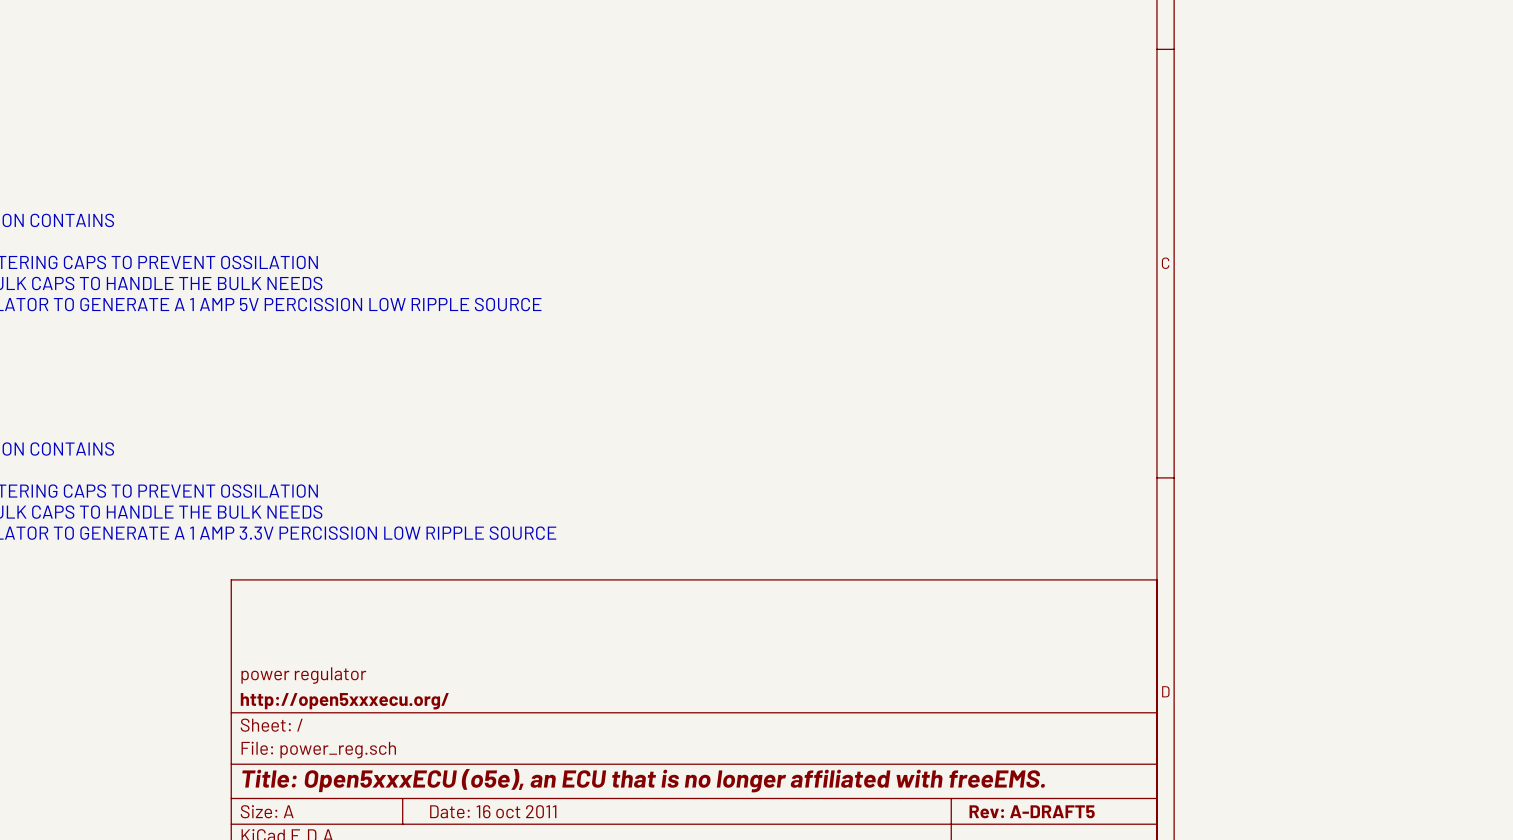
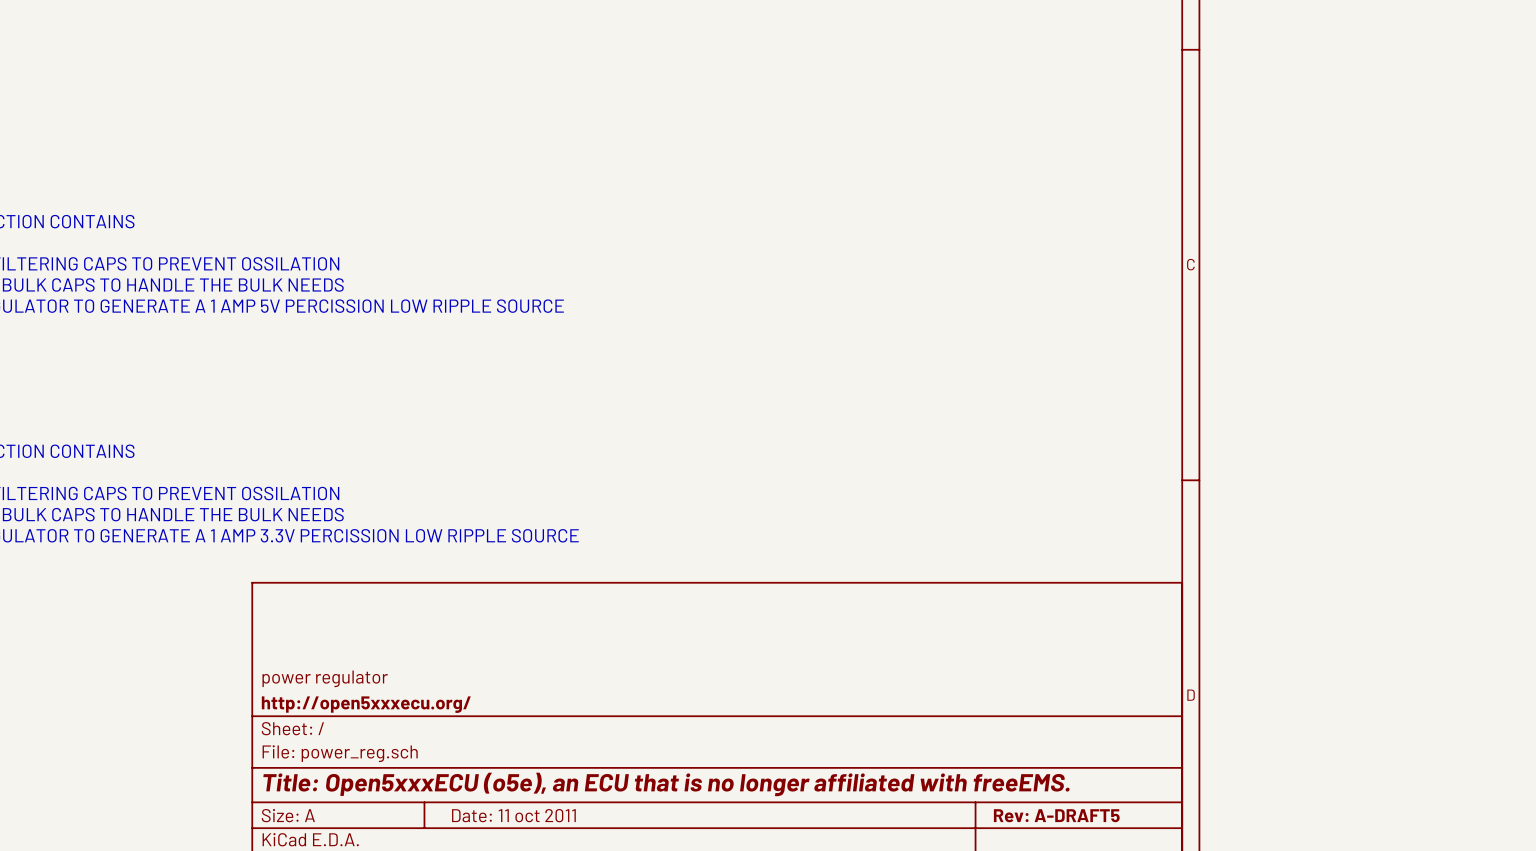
title block: Date: 16 oct 2011 (493, 811) -> Date: 11 oct 2011 (513, 815)

